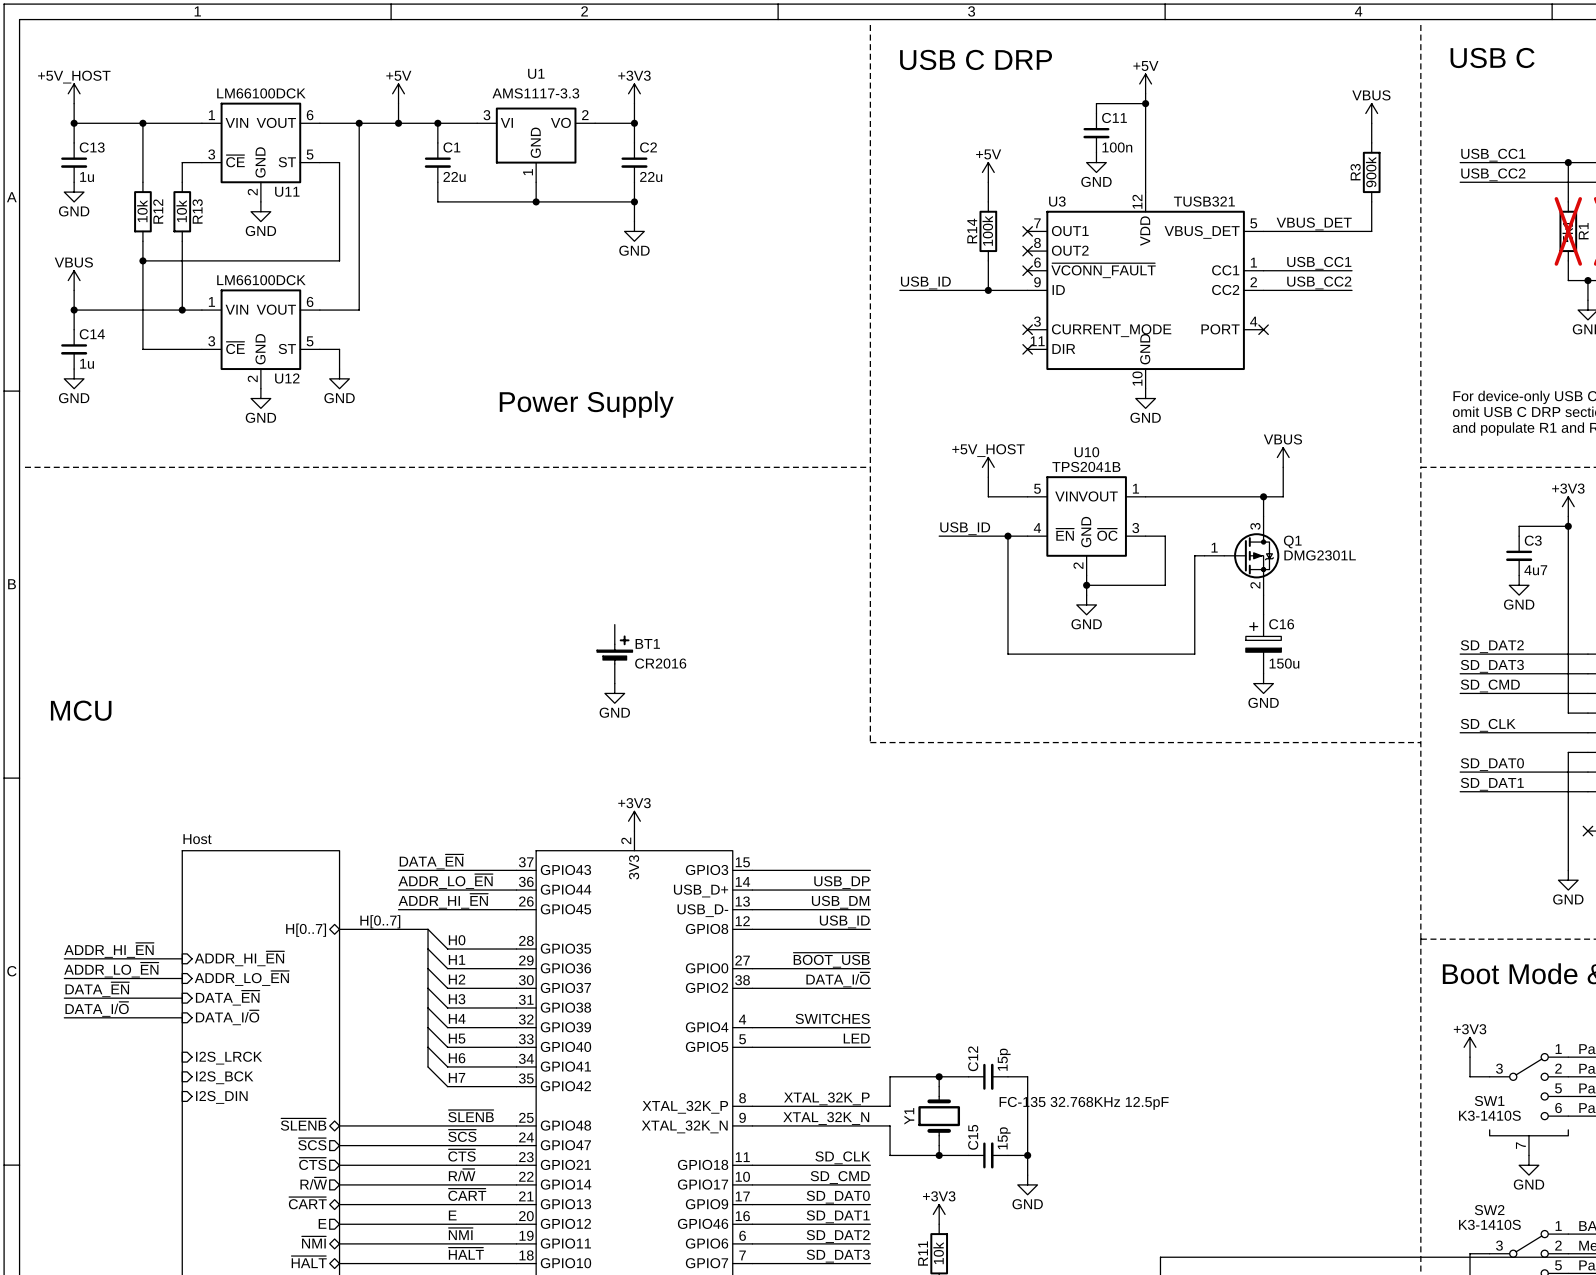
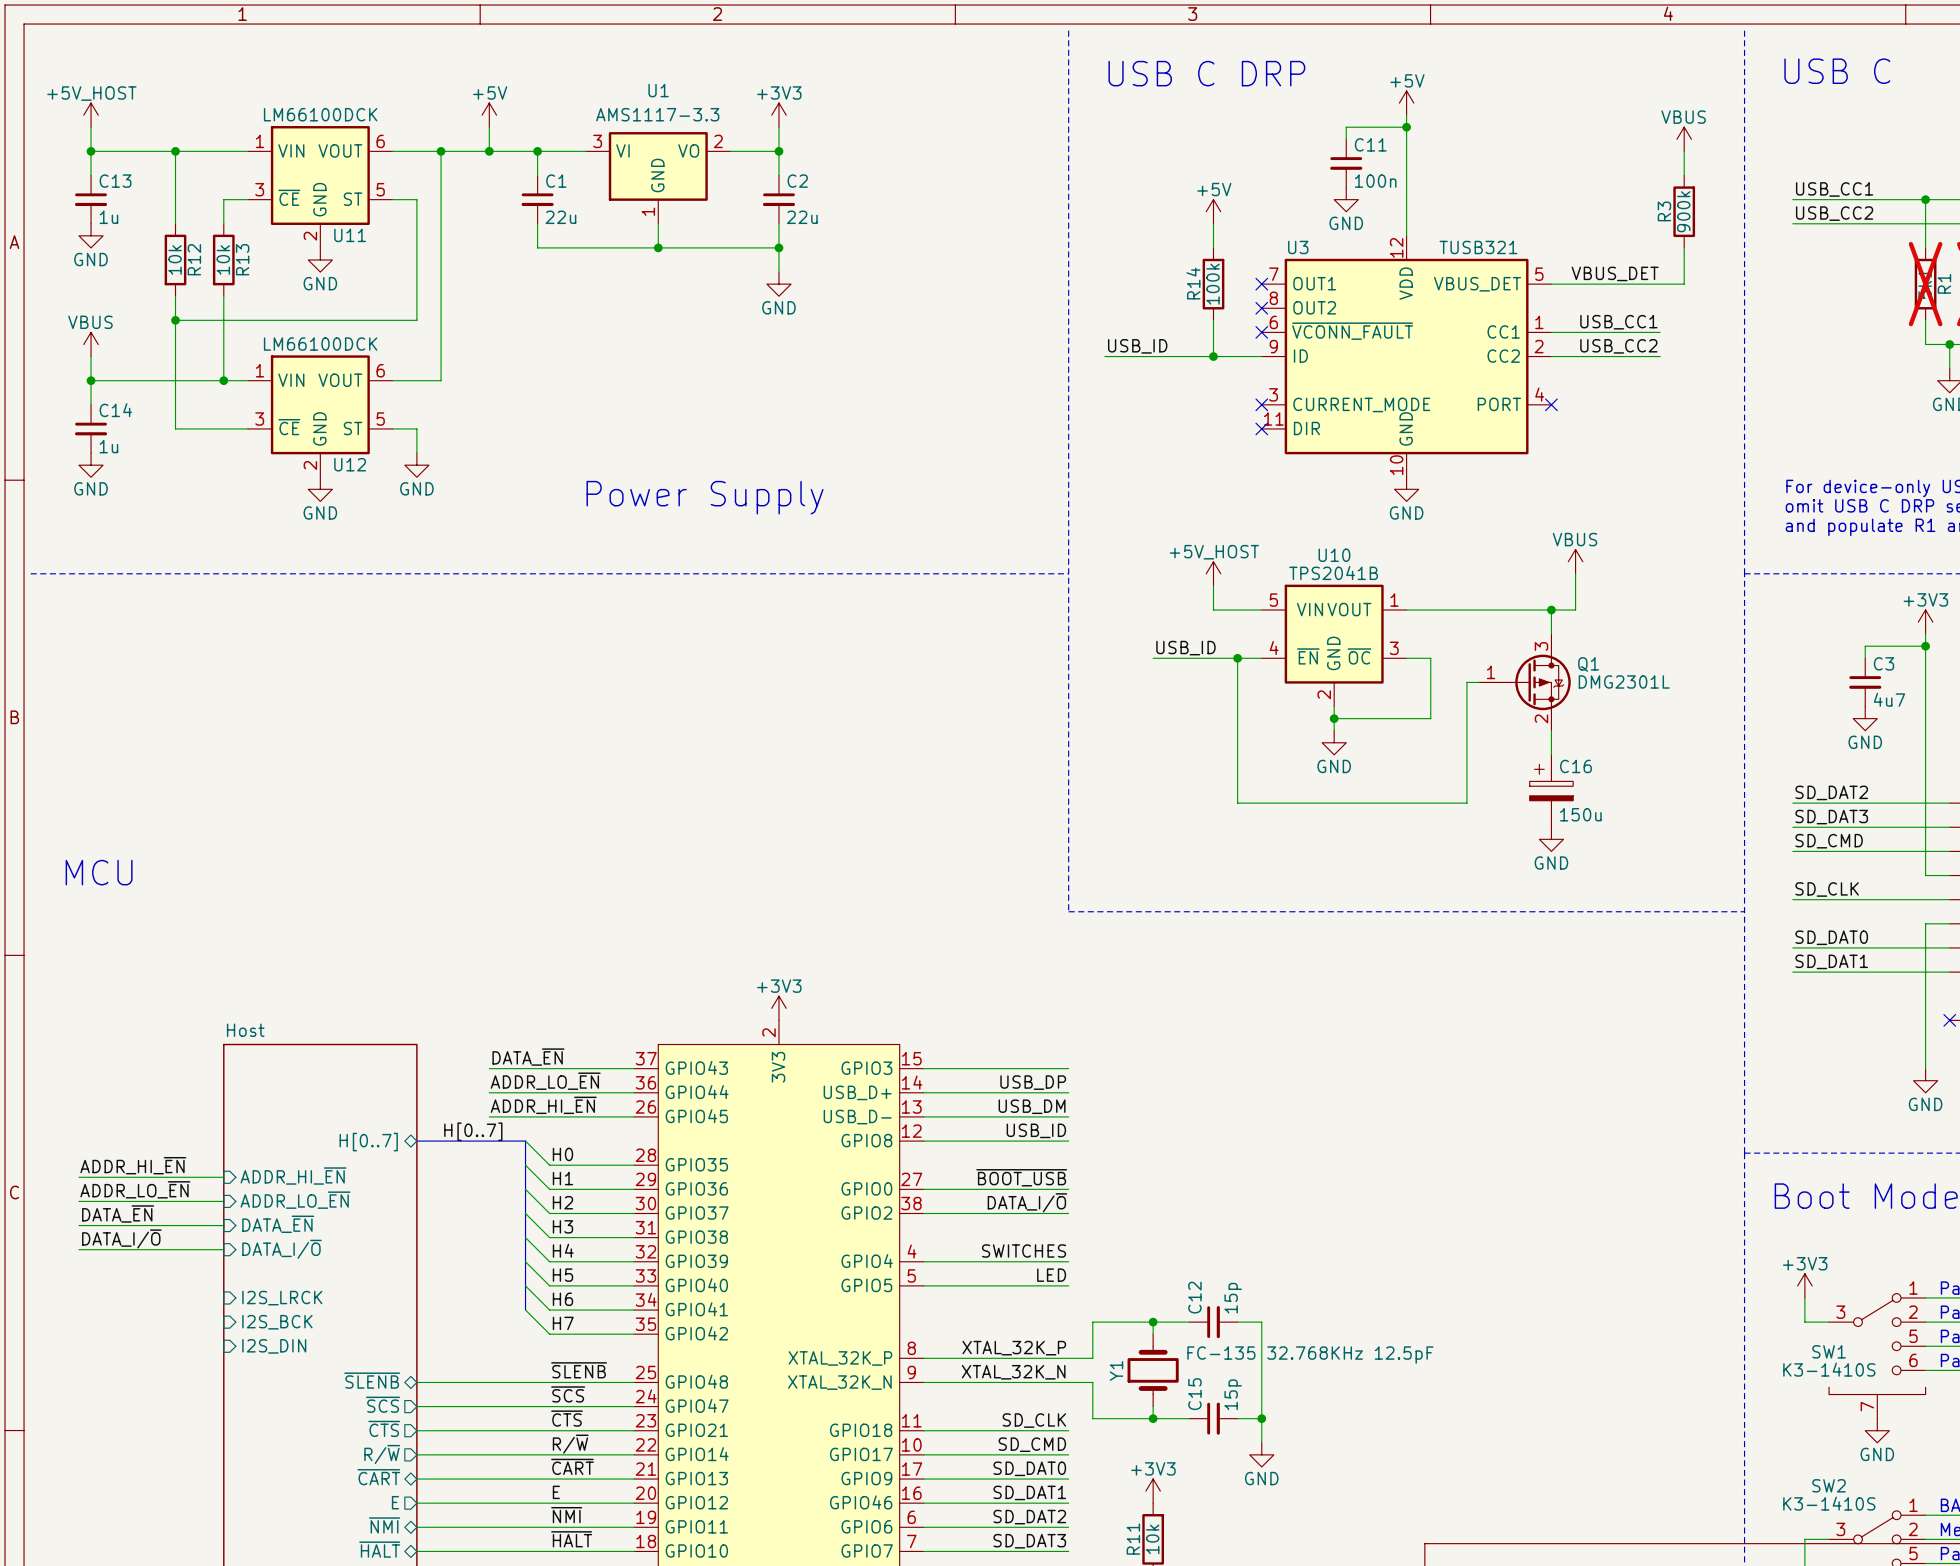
BT1: CR2016 (614, 654) -> none
power symbol: GND (614, 693) -> none

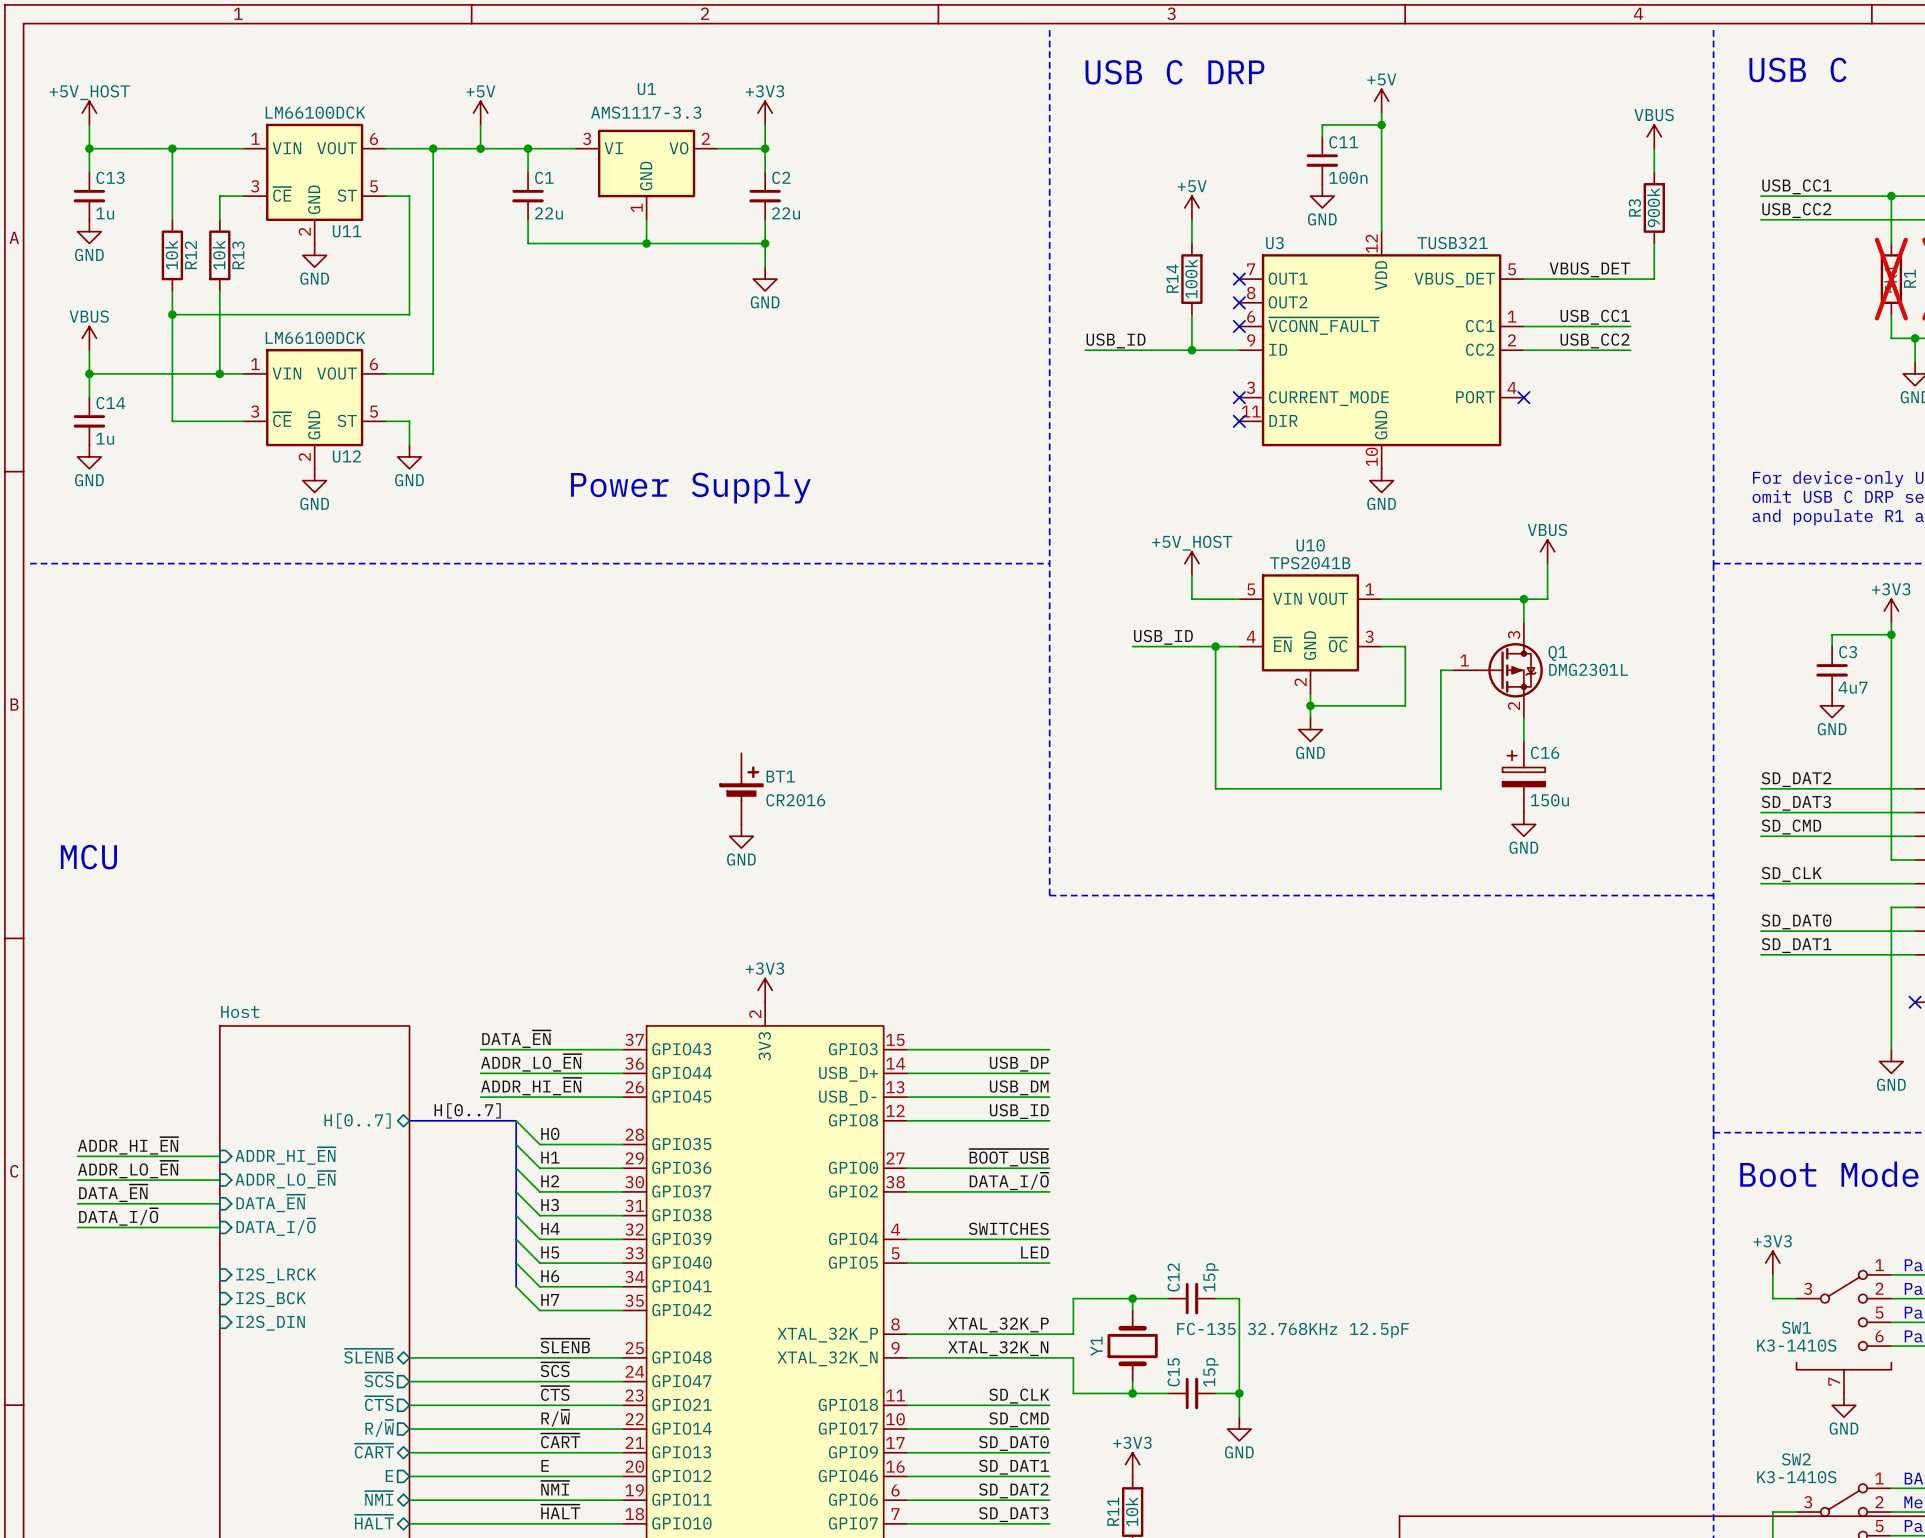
BT1: none -> CR2016 (741, 788)
power symbol: none -> GND (741, 836)

